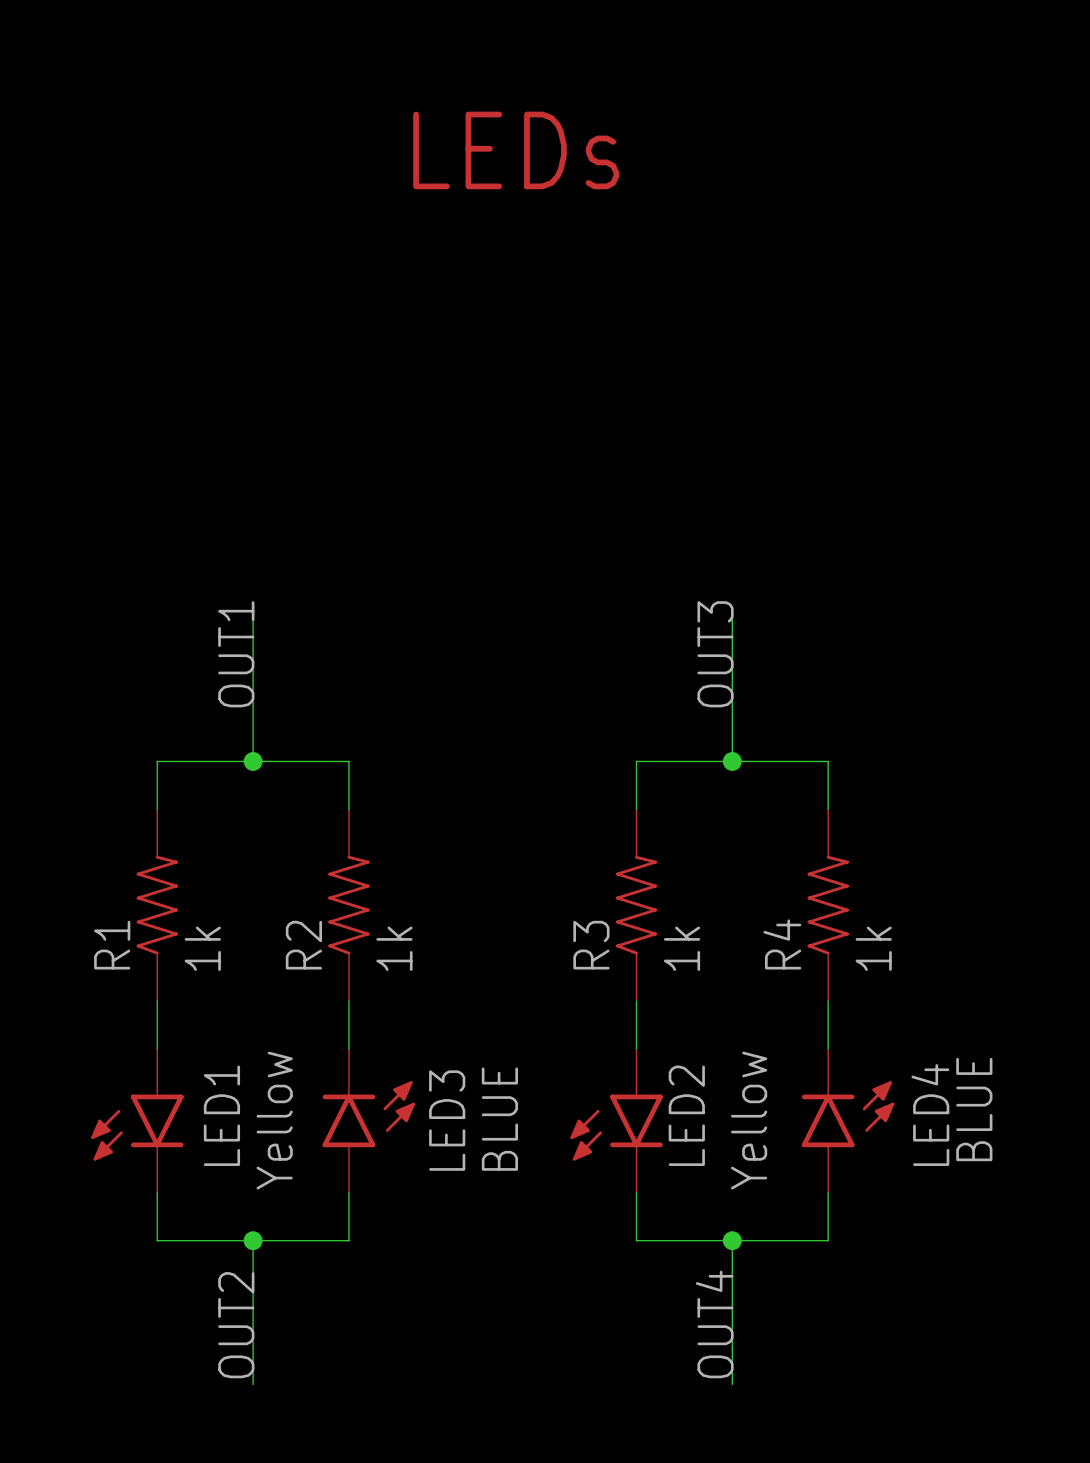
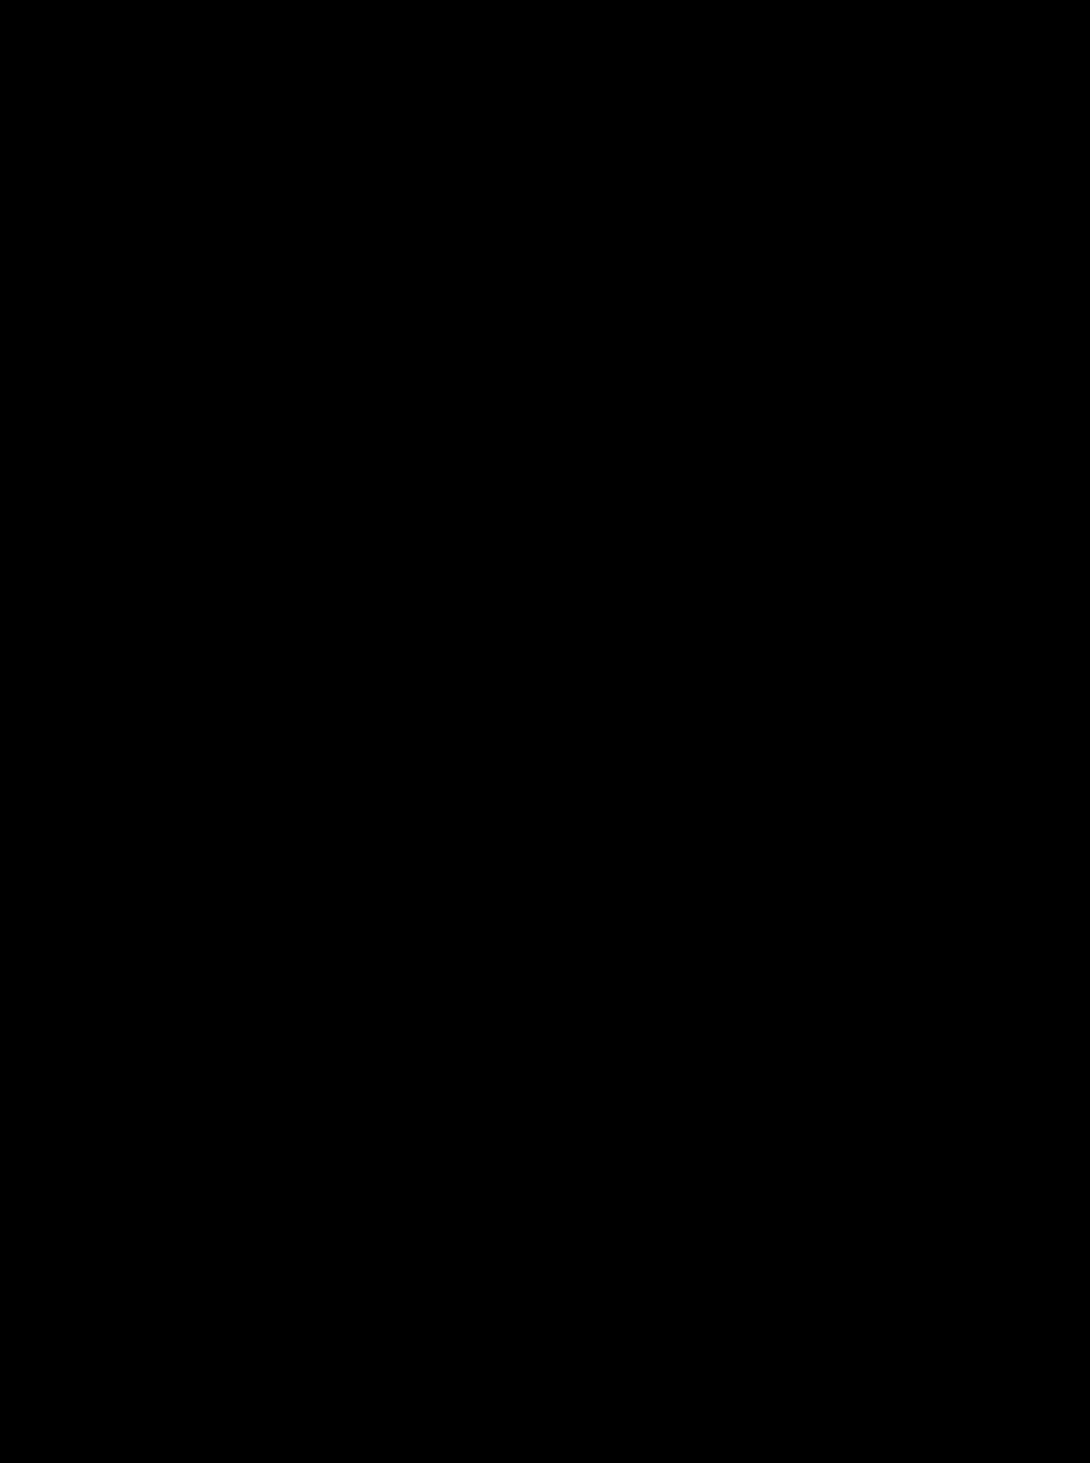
text: LEDs (516, 150) -> none
wire: (253, 617) (253, 761) -> none
wire: (732, 617) (732, 761) -> none
label: OUT1 (236, 654) -> none
label: OUT3 (715, 654) -> none
junction: (253, 761) -> none
junction: (732, 761) -> none
wire: (157, 809) (157, 761) (348, 761) (348, 809) -> none
wire: (636, 809) (636, 761) (828, 761) (828, 809) -> none
R1: 1k (157, 905) -> none
R2: 1k (348, 905) -> none
R3: 1k (636, 905) -> none
R4: 1k (828, 905) -> none
wire: (157, 1001) (157, 1049) -> none
wire: (348, 1001) (348, 1049) -> none
wire: (636, 1001) (636, 1049) -> none
wire: (828, 1001) (828, 1049) -> none
LED1: Yellow (137, 1120) -> none
LED3: BLUE (368, 1120) -> none
LED2: Yellow (616, 1120) -> none
LED4: BLUE (848, 1120) -> none
wire: (157, 1192) (157, 1240) (348, 1240) (348, 1192) -> none
wire: (636, 1192) (636, 1240) (828, 1240) (828, 1192) -> none
wire: (253, 1240) (253, 1384) -> none
junction: (253, 1240) -> none
wire: (732, 1240) (732, 1384) -> none
junction: (732, 1240) -> none
label: OUT4 (714, 1324) -> none
label: OUT2 (236, 1325) -> none

